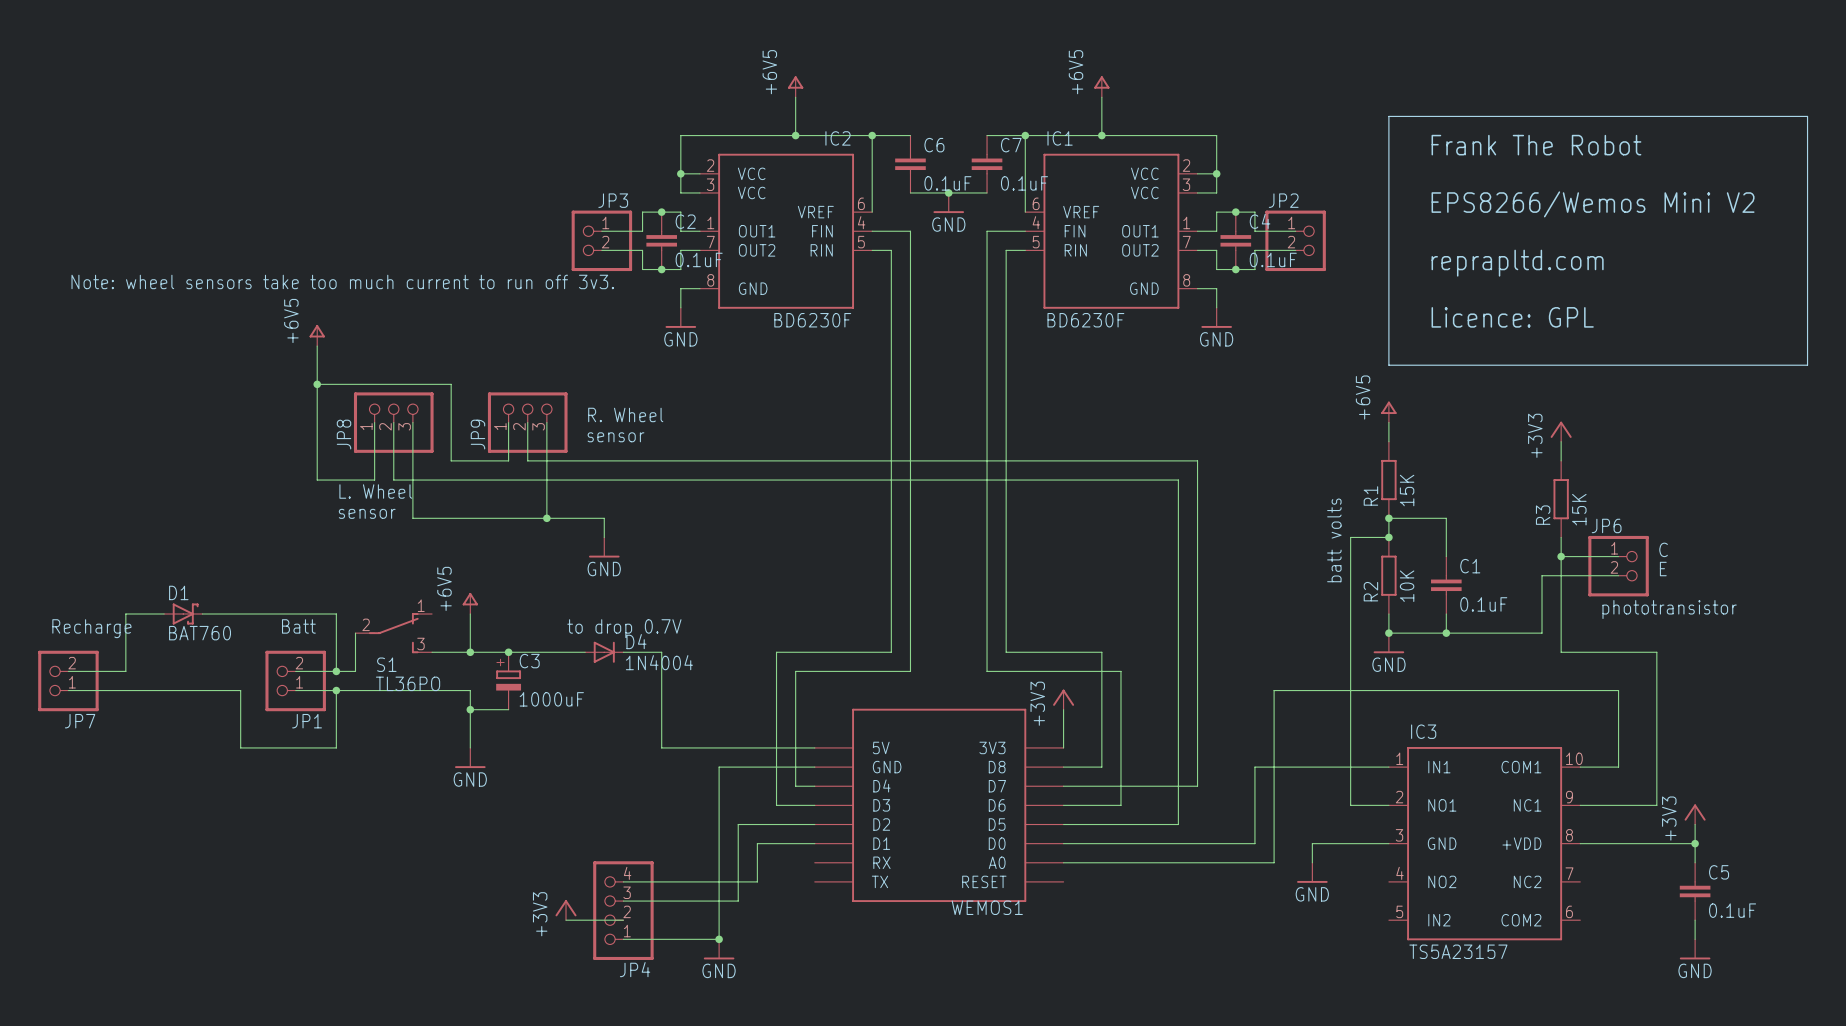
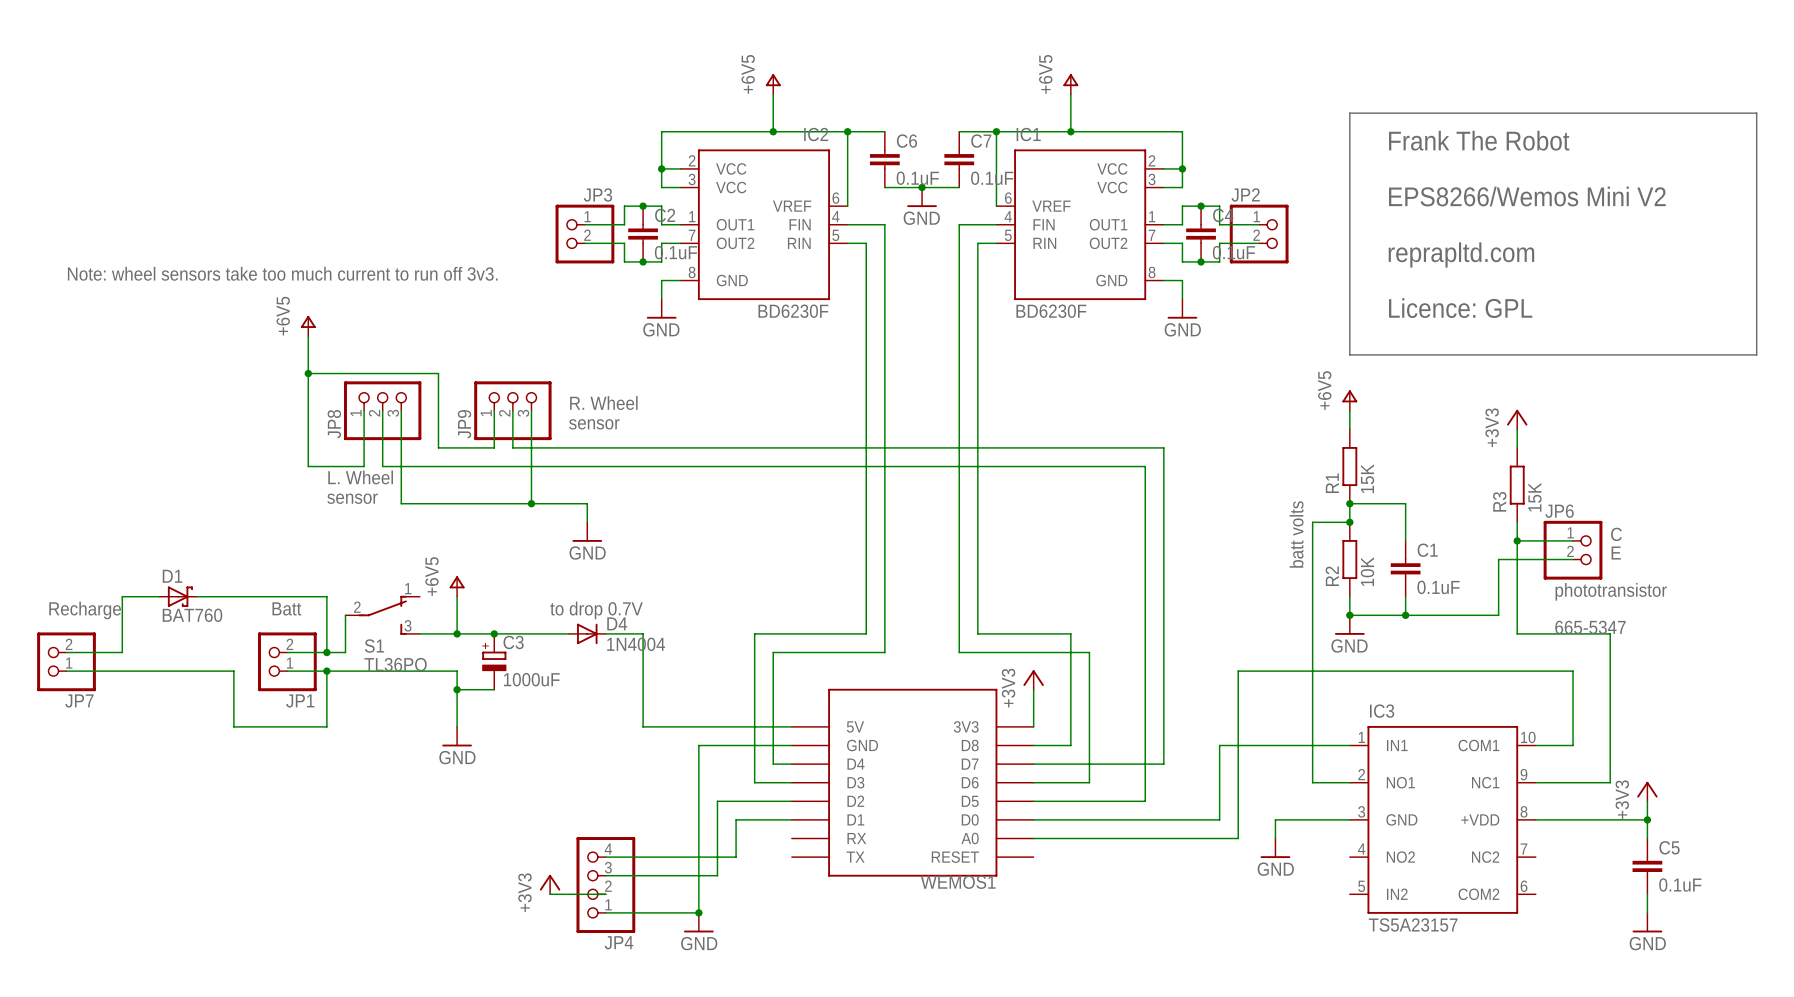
text: none -> 665‑5347 (1590, 627)

